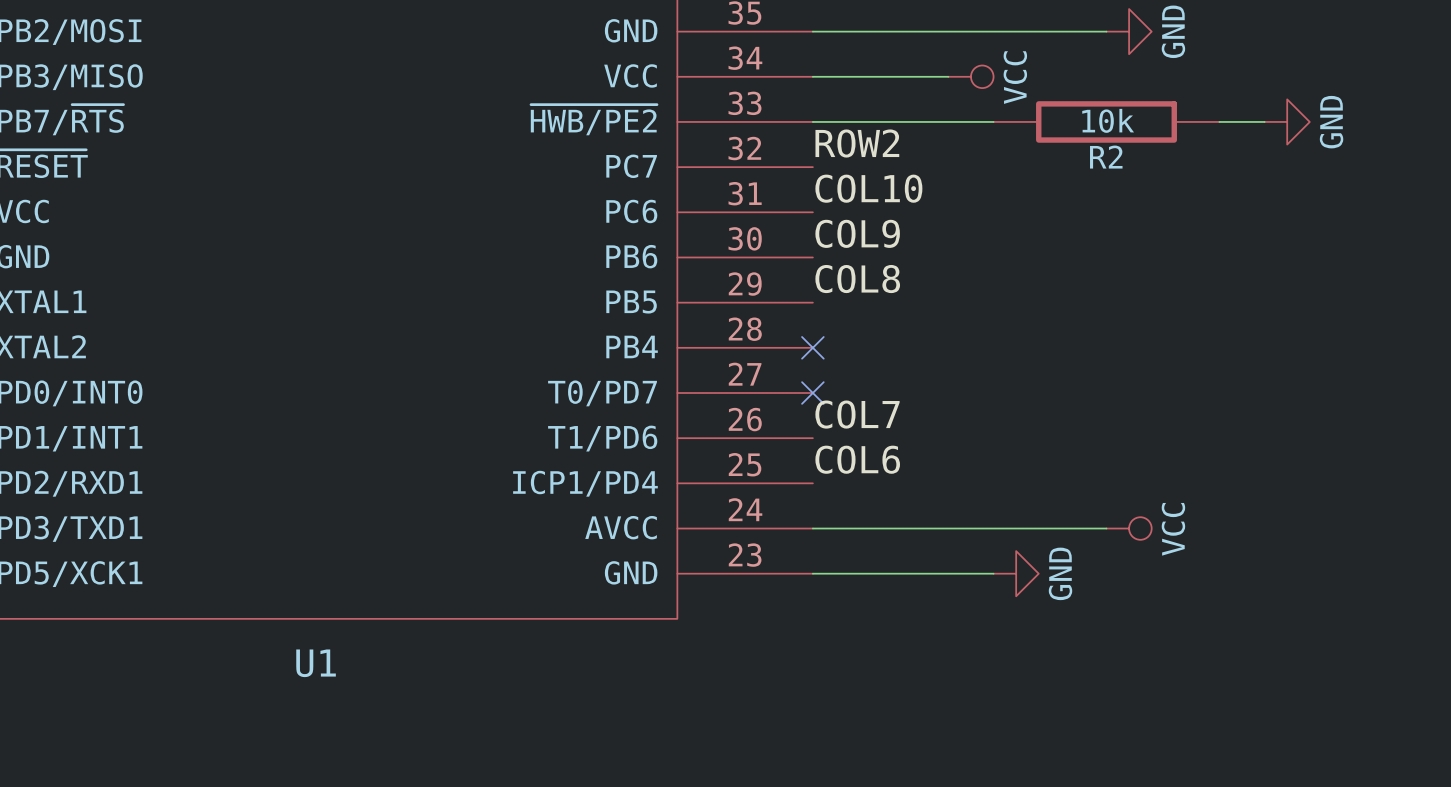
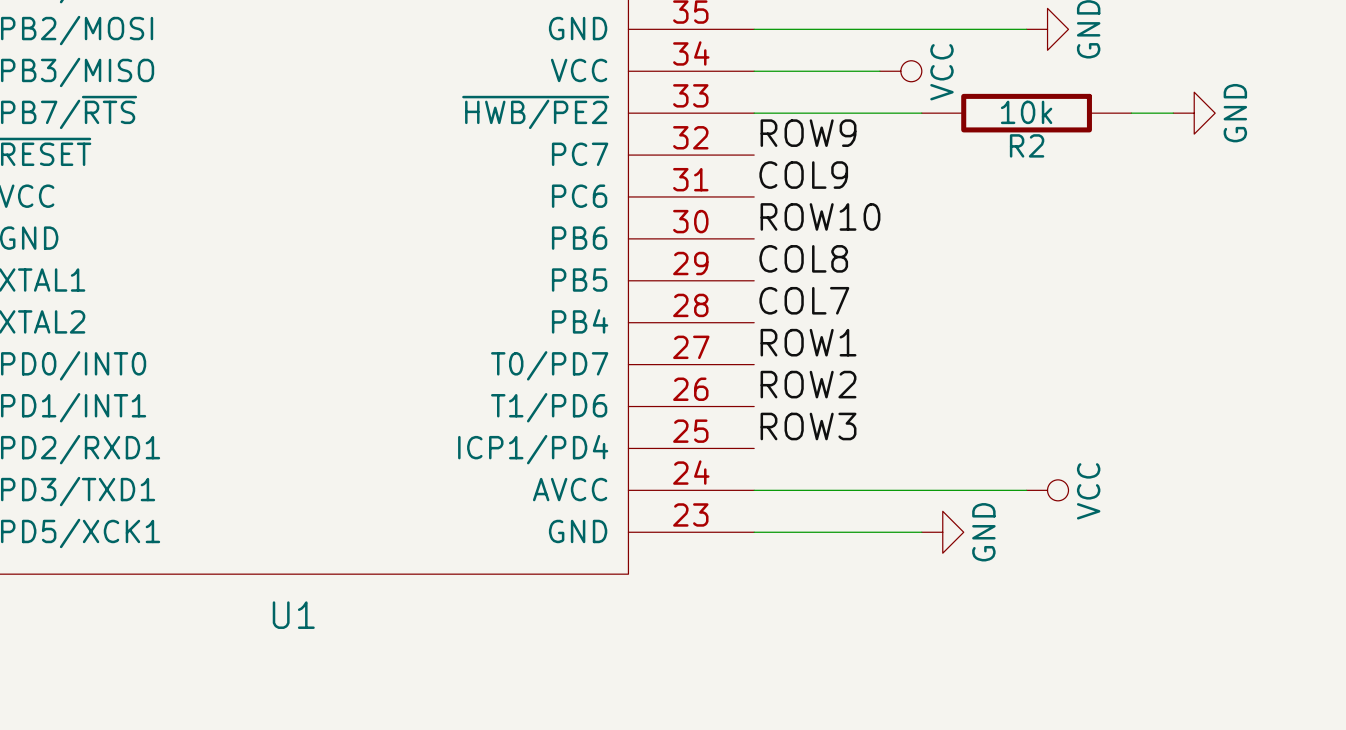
label: ROW2 (857, 143) -> ROW9 (808, 133)
label: COL10 (868, 188) -> COL9 (803, 175)
label: COL9 (857, 233) -> ROW10 (820, 216)
label: none -> COL7 (804, 300)
no-connect mark: (812, 347) -> none
label: none -> ROW1 (808, 342)
no-connect mark: (812, 393) -> none
label: COL7 (857, 414) -> ROW2 (808, 384)
label: COL6 (857, 459) -> ROW3 (808, 426)

